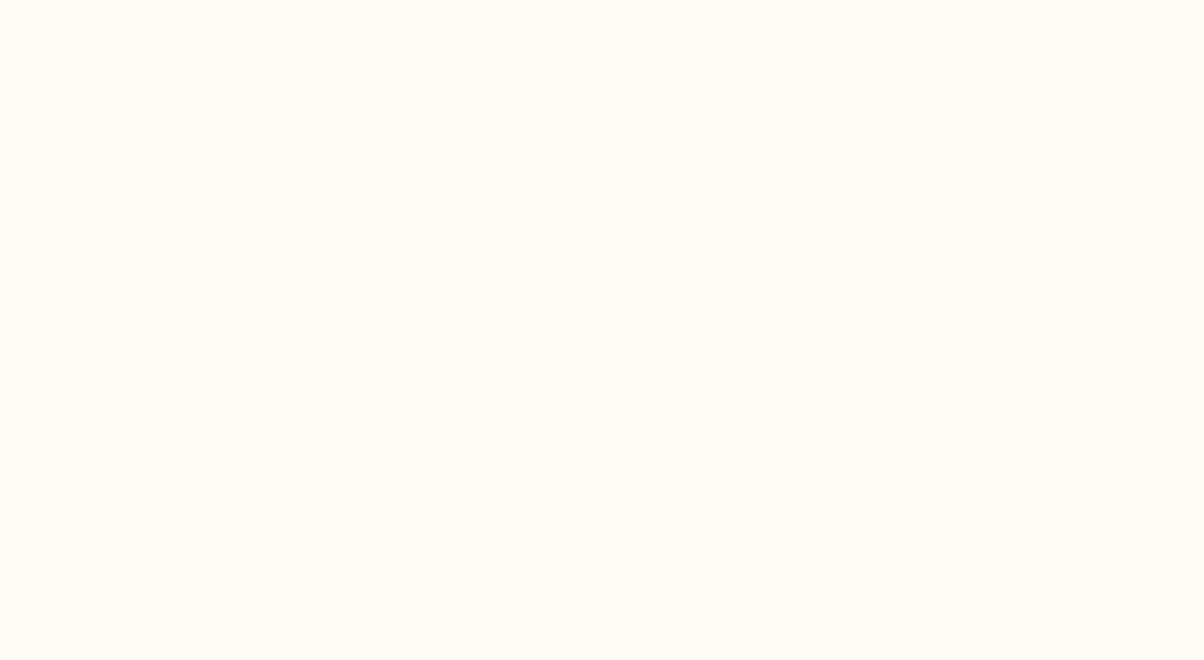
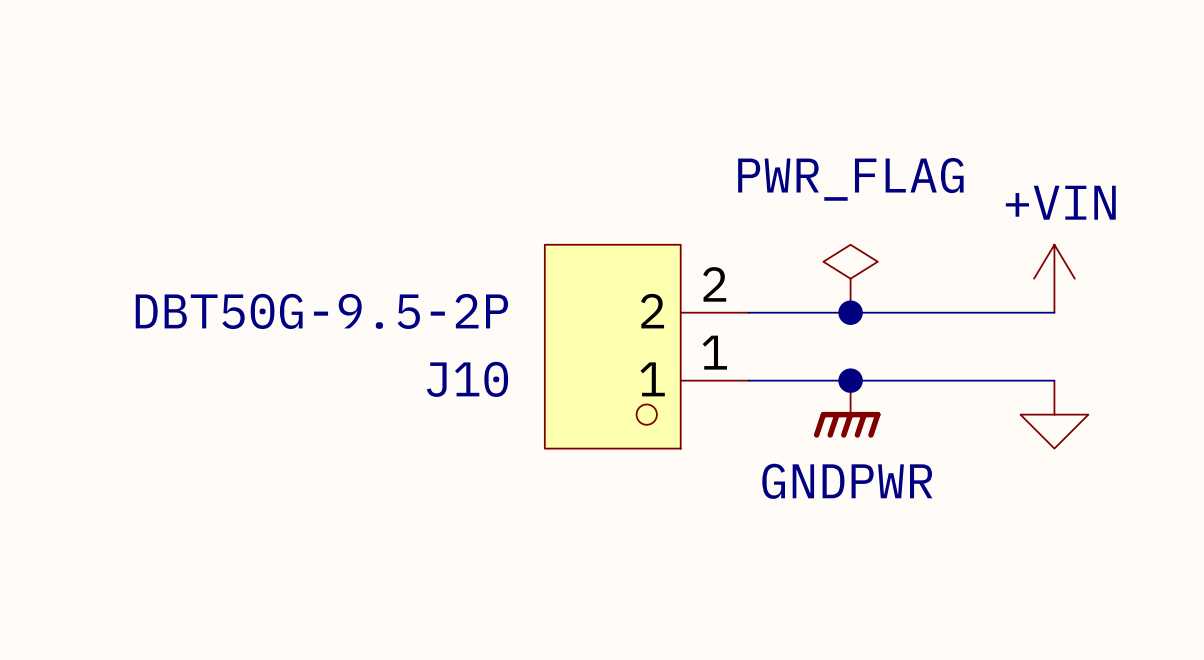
power symbol: none -> PWR_FLAG (850, 278)
power symbol: none -> +VIN (1054, 278)
wire: none -> (748, 312) (1054, 312)
junction: none -> (850, 312)
J10: none -> DBT50G-9.5-2P (646, 346)
wire: none -> (748, 380) (1054, 380)
junction: none -> (850, 380)
power symbol: none -> GNDPWR (847, 409)
power symbol: none -> (1054, 414)

